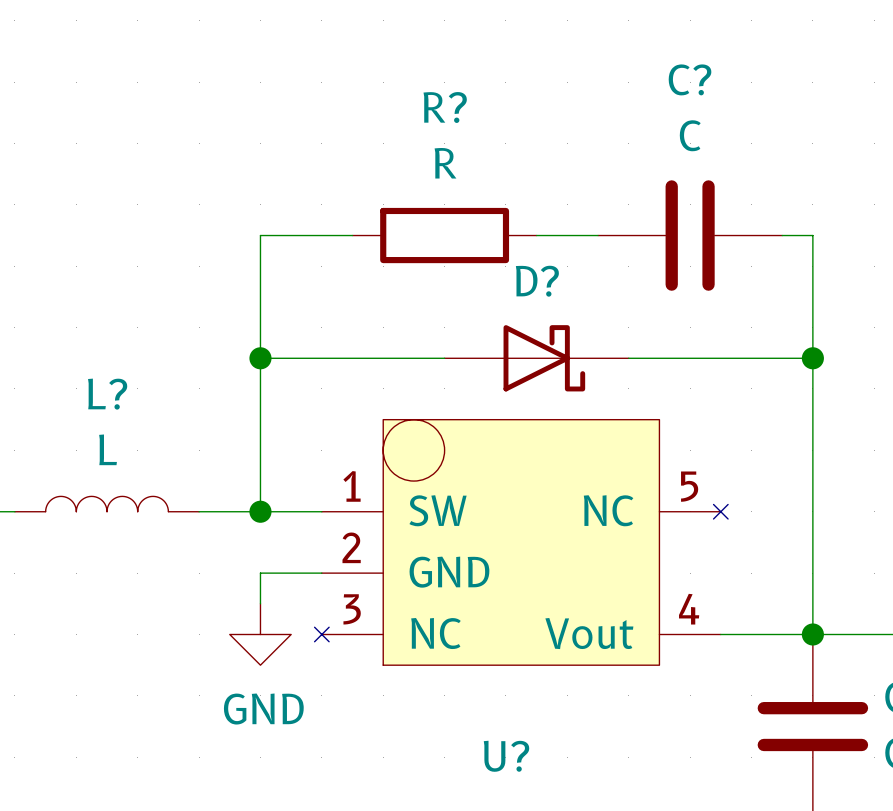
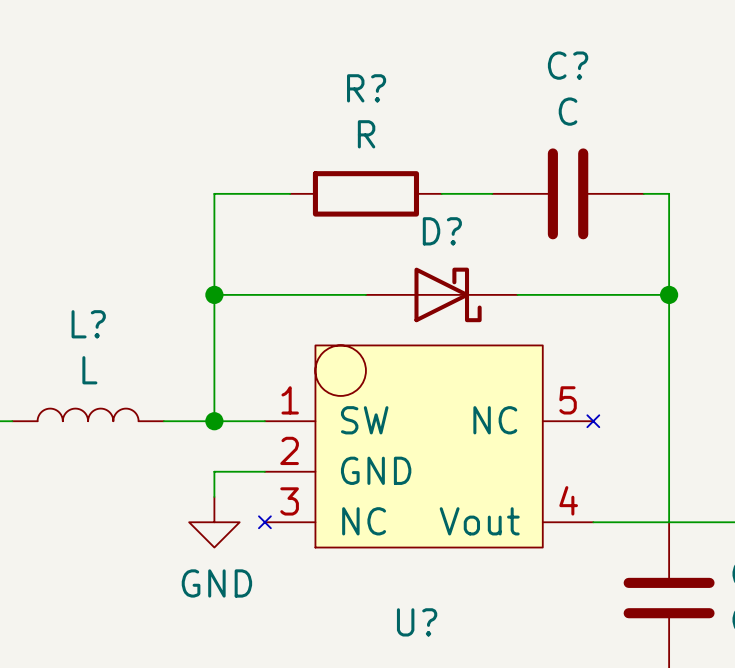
junction: (812, 634) -> none

